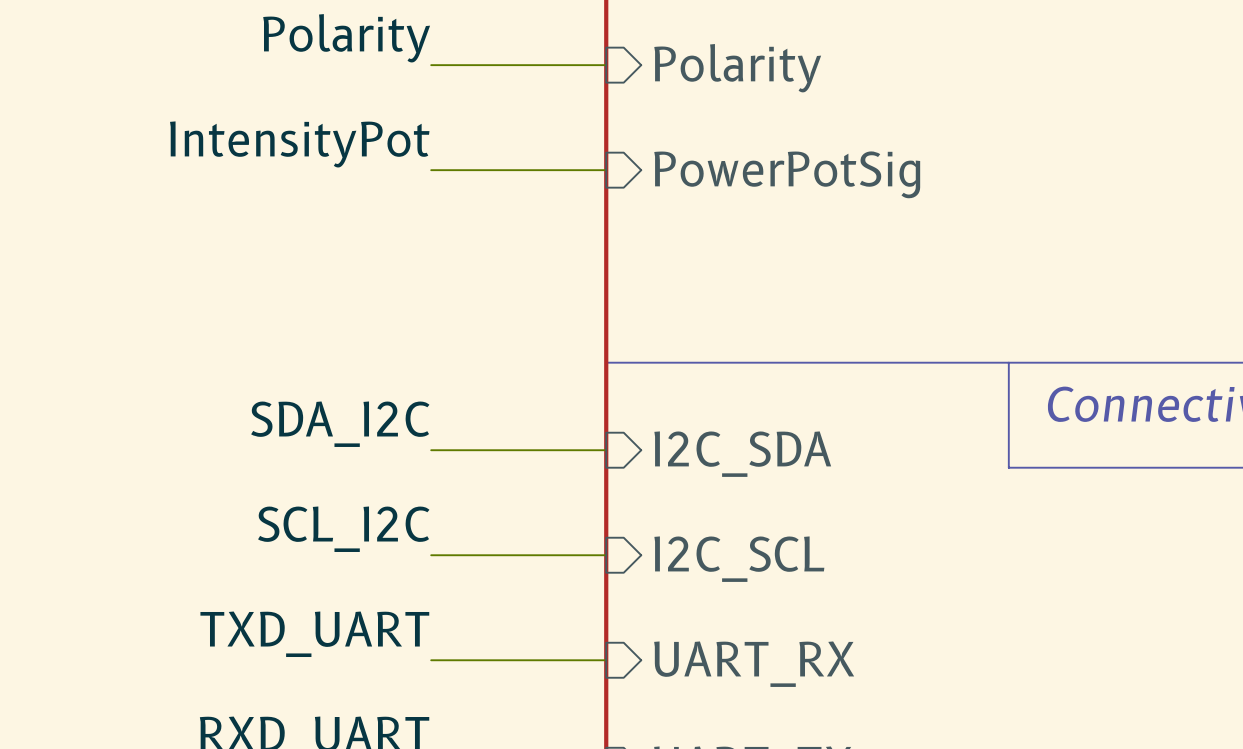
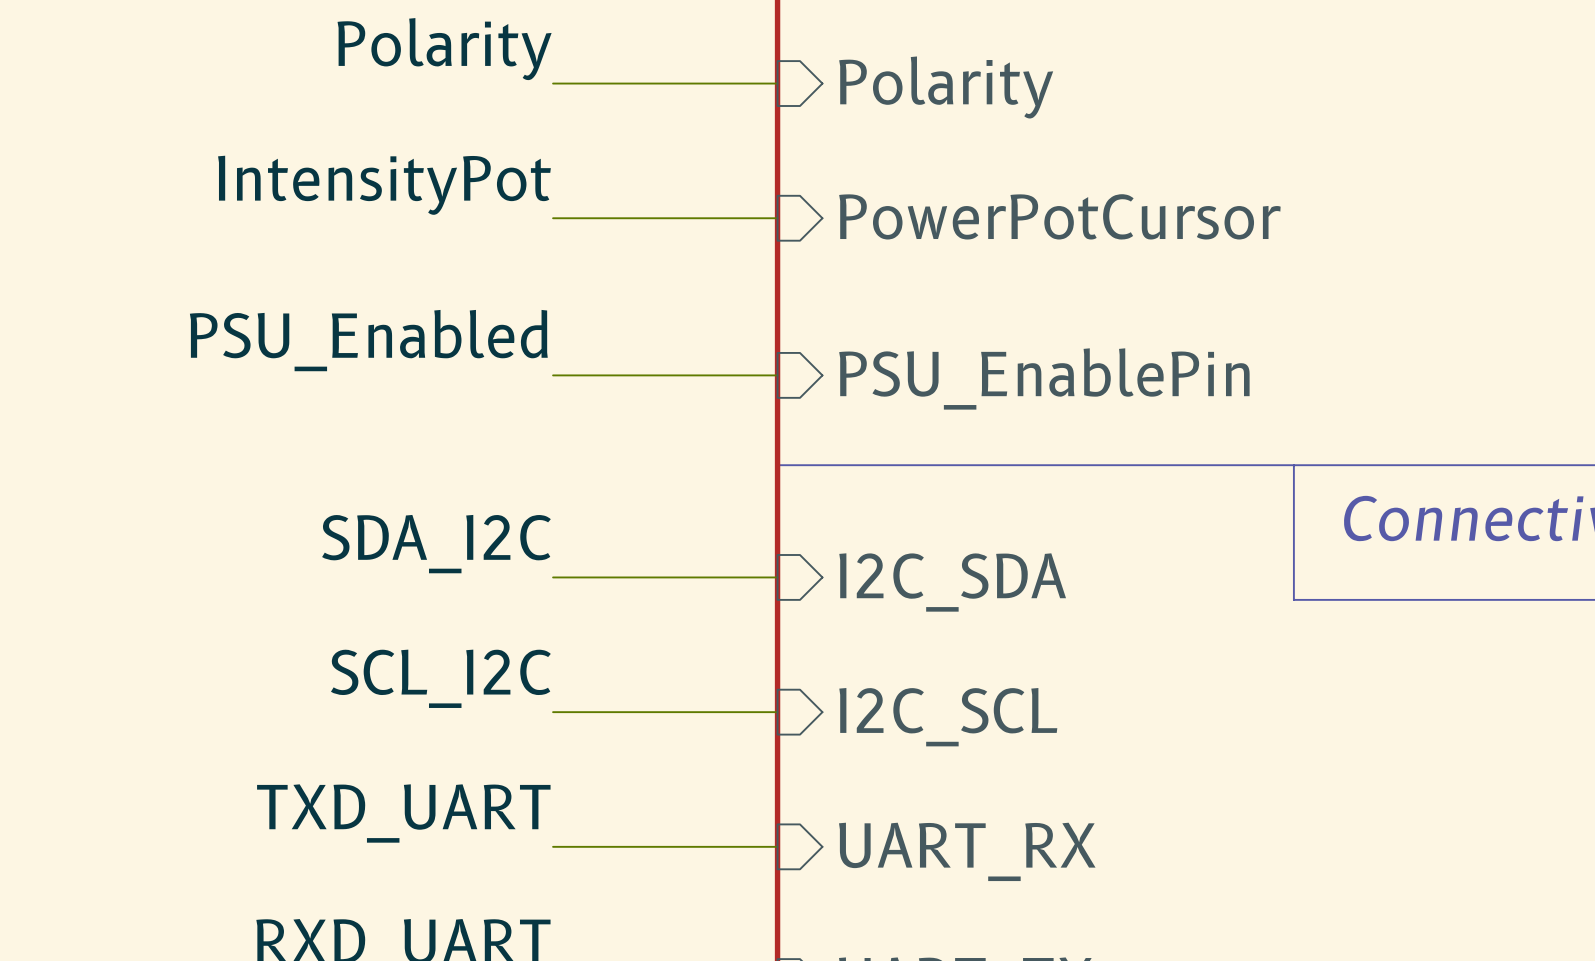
sheet pin: PowerPotSig (787, 174) -> PowerPotCursor (1059, 216)
label: none -> PSU_Enabled (368, 340)
wire: none -> (553, 375) (777, 375)
sheet pin: none -> PSU_EnablePin (1044, 378)

